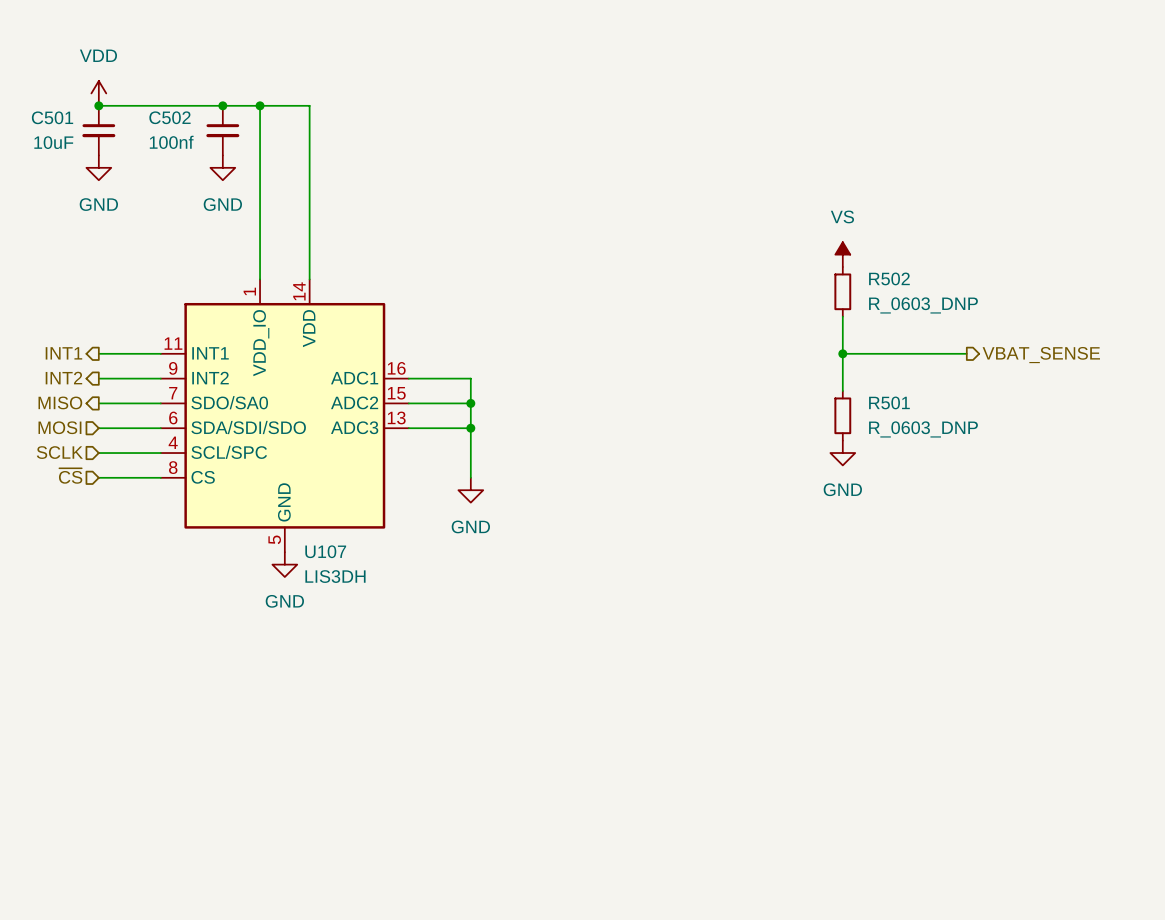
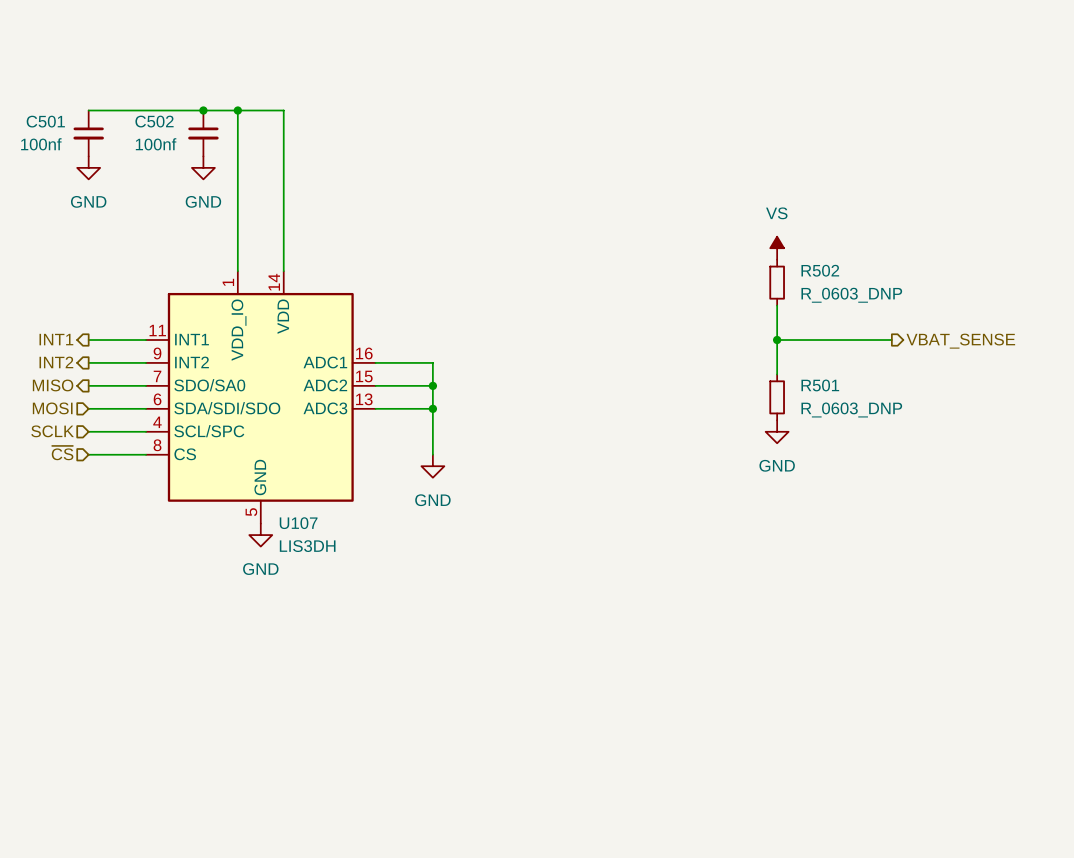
power symbol: VDD (98, 93) -> none
junction: (98, 105) -> none
C501 text: 10uF (53, 142) -> 100nf (41, 144)

